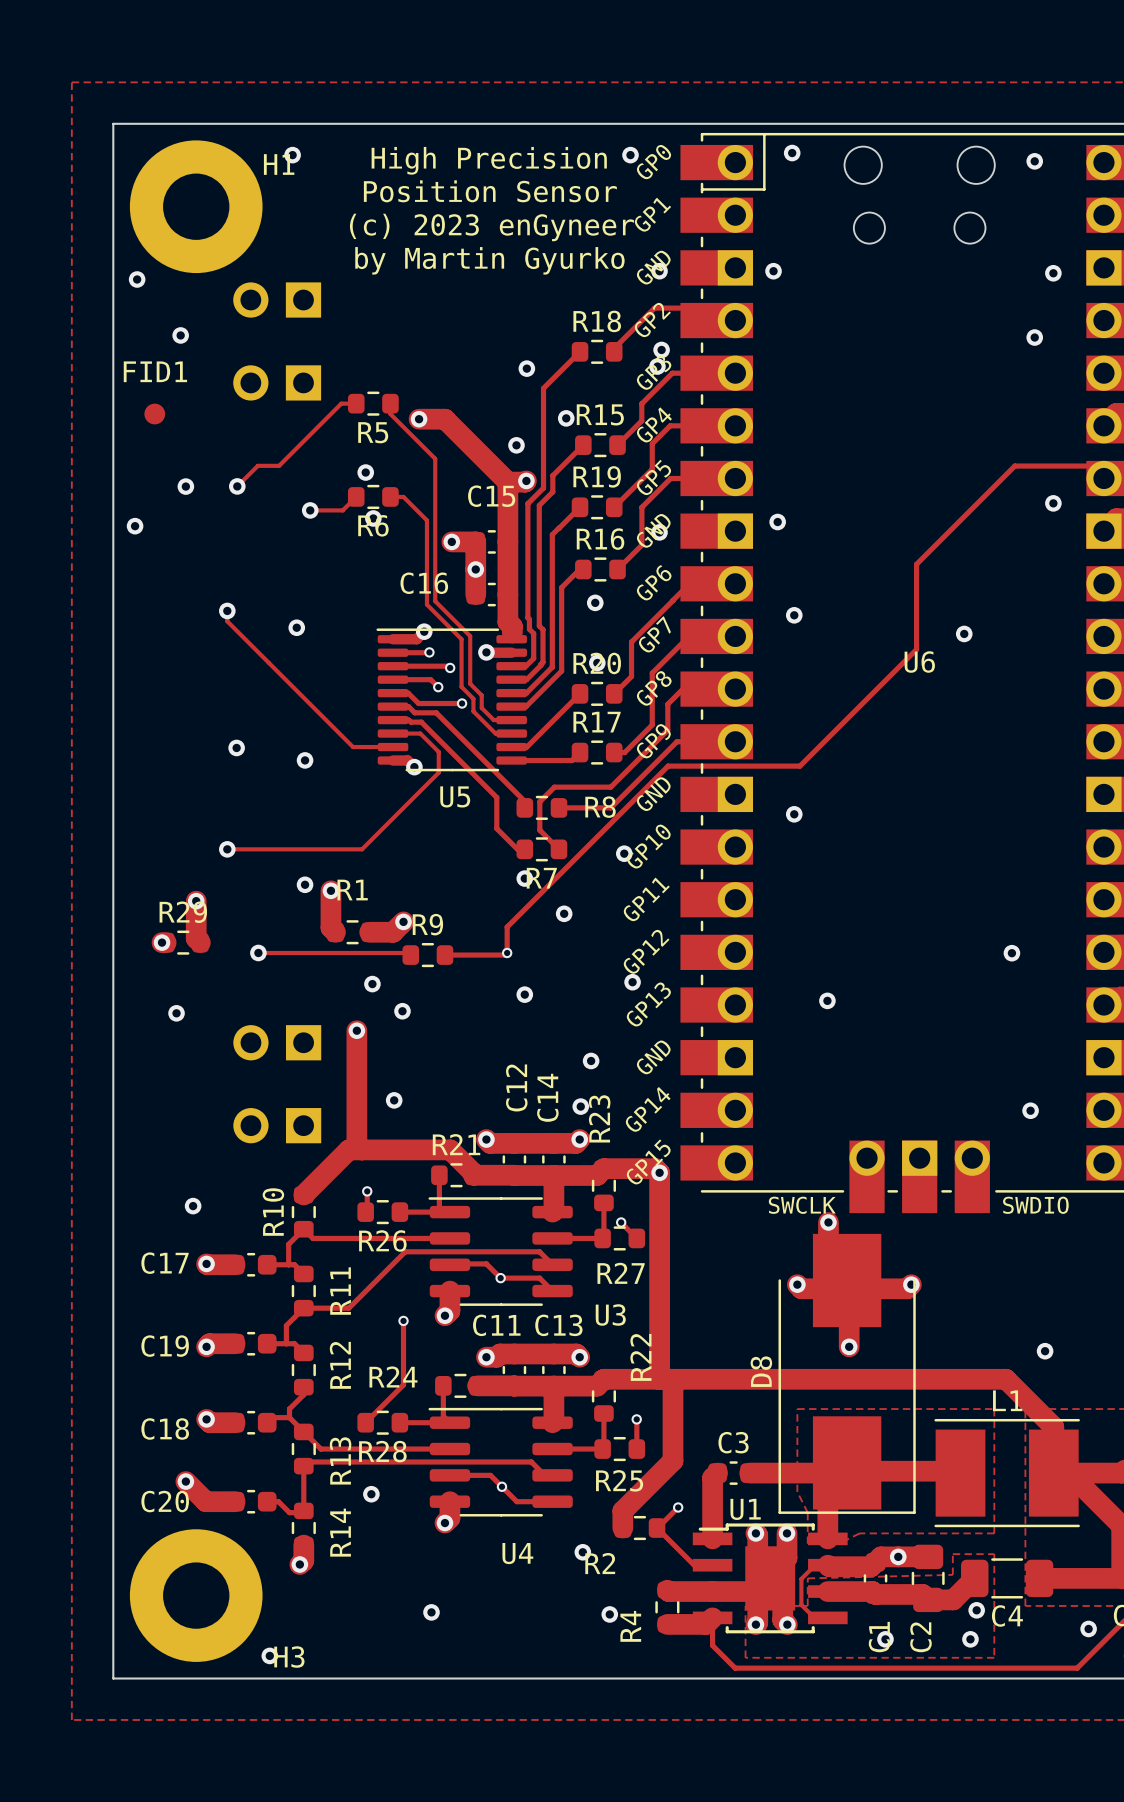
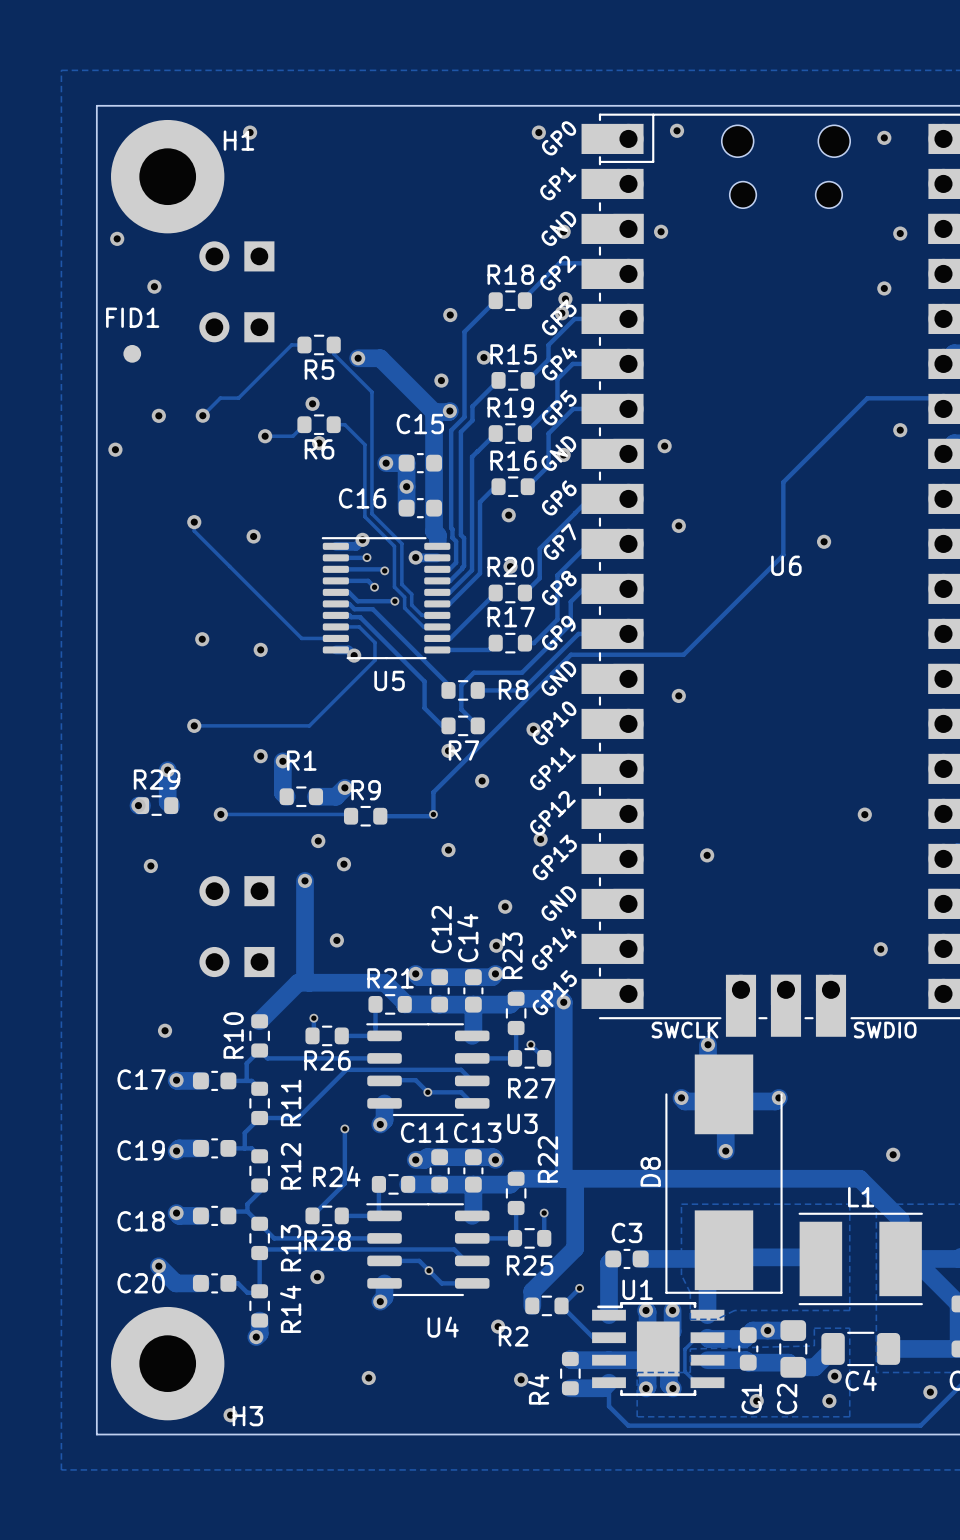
text: High Precision (489, 160) -> none
text: Position Sensor (490, 191) -> none
text: (c) 2023 enGyneer (491, 227) -> none
text: by Martin Gyurko (489, 260) -> none

